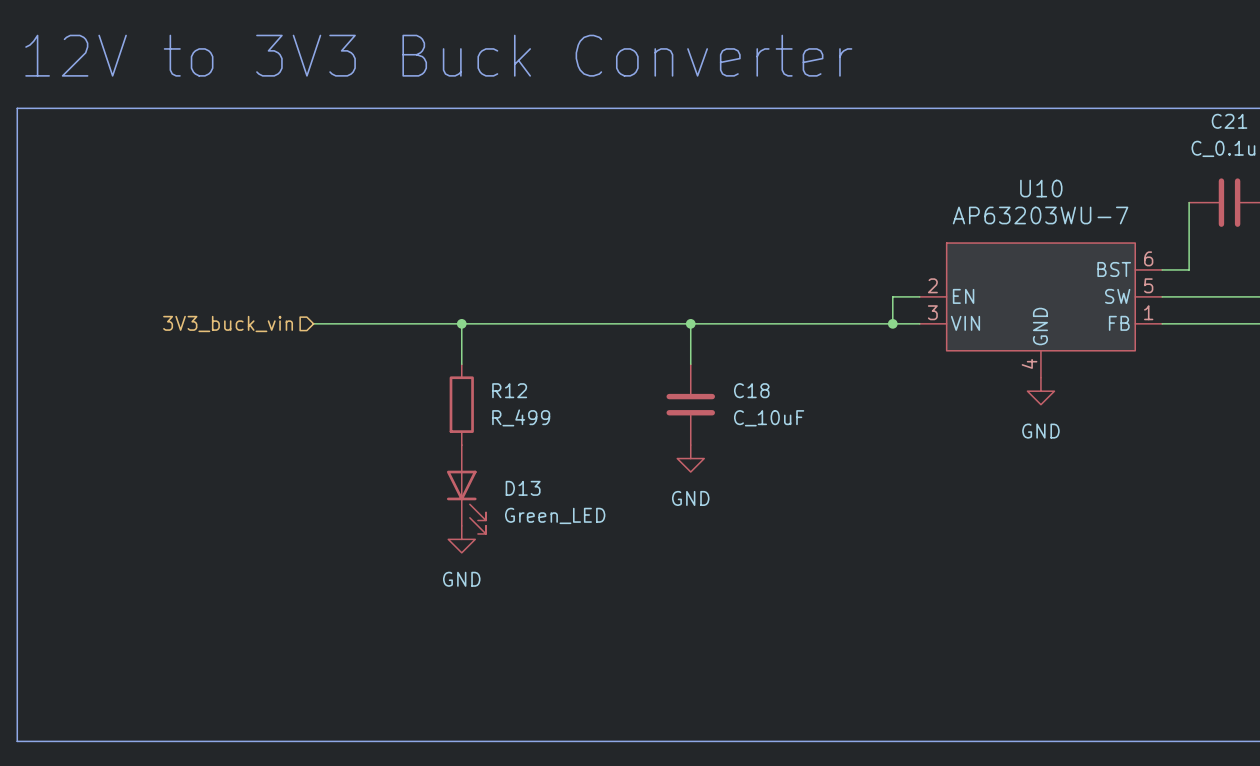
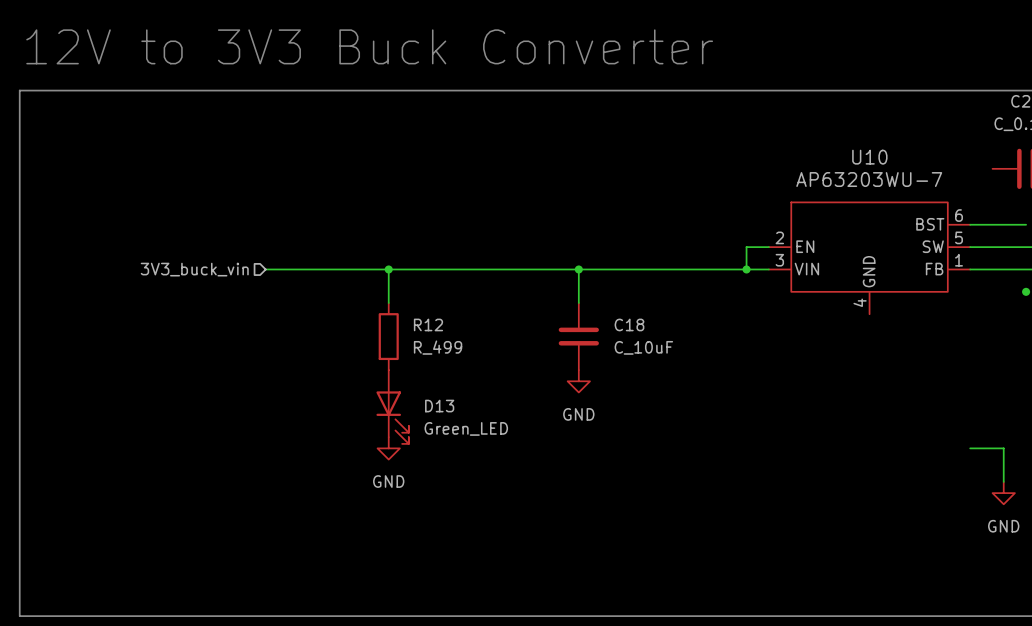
wire: (1189, 202) (1189, 269) -> (1026, 224) (992, 224)
junction: none -> (1026, 291)
power symbol position: GND (1040, 391) -> GND (1003, 493)
wire: none -> (970, 448) (1003, 448) (1003, 481)

